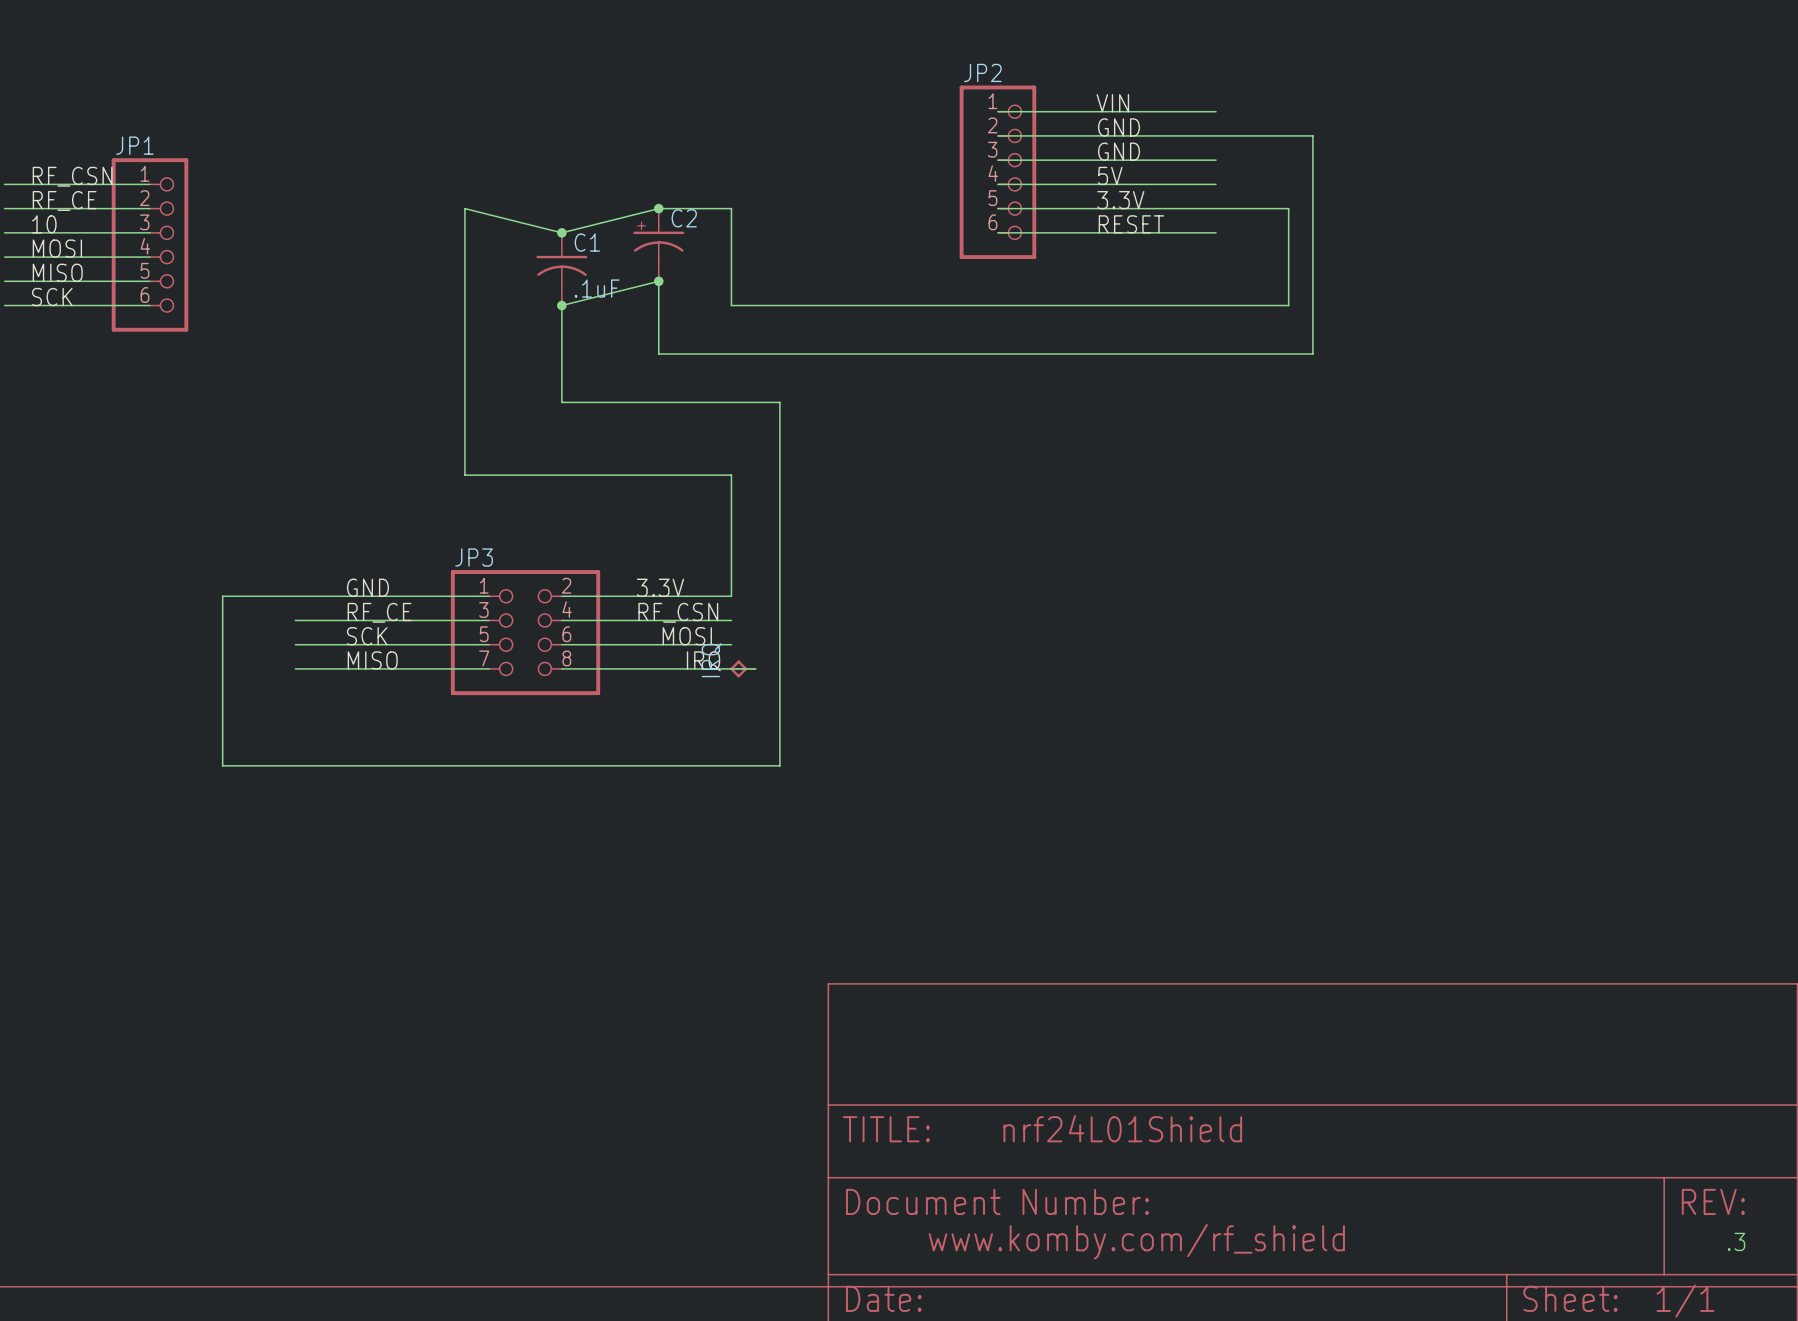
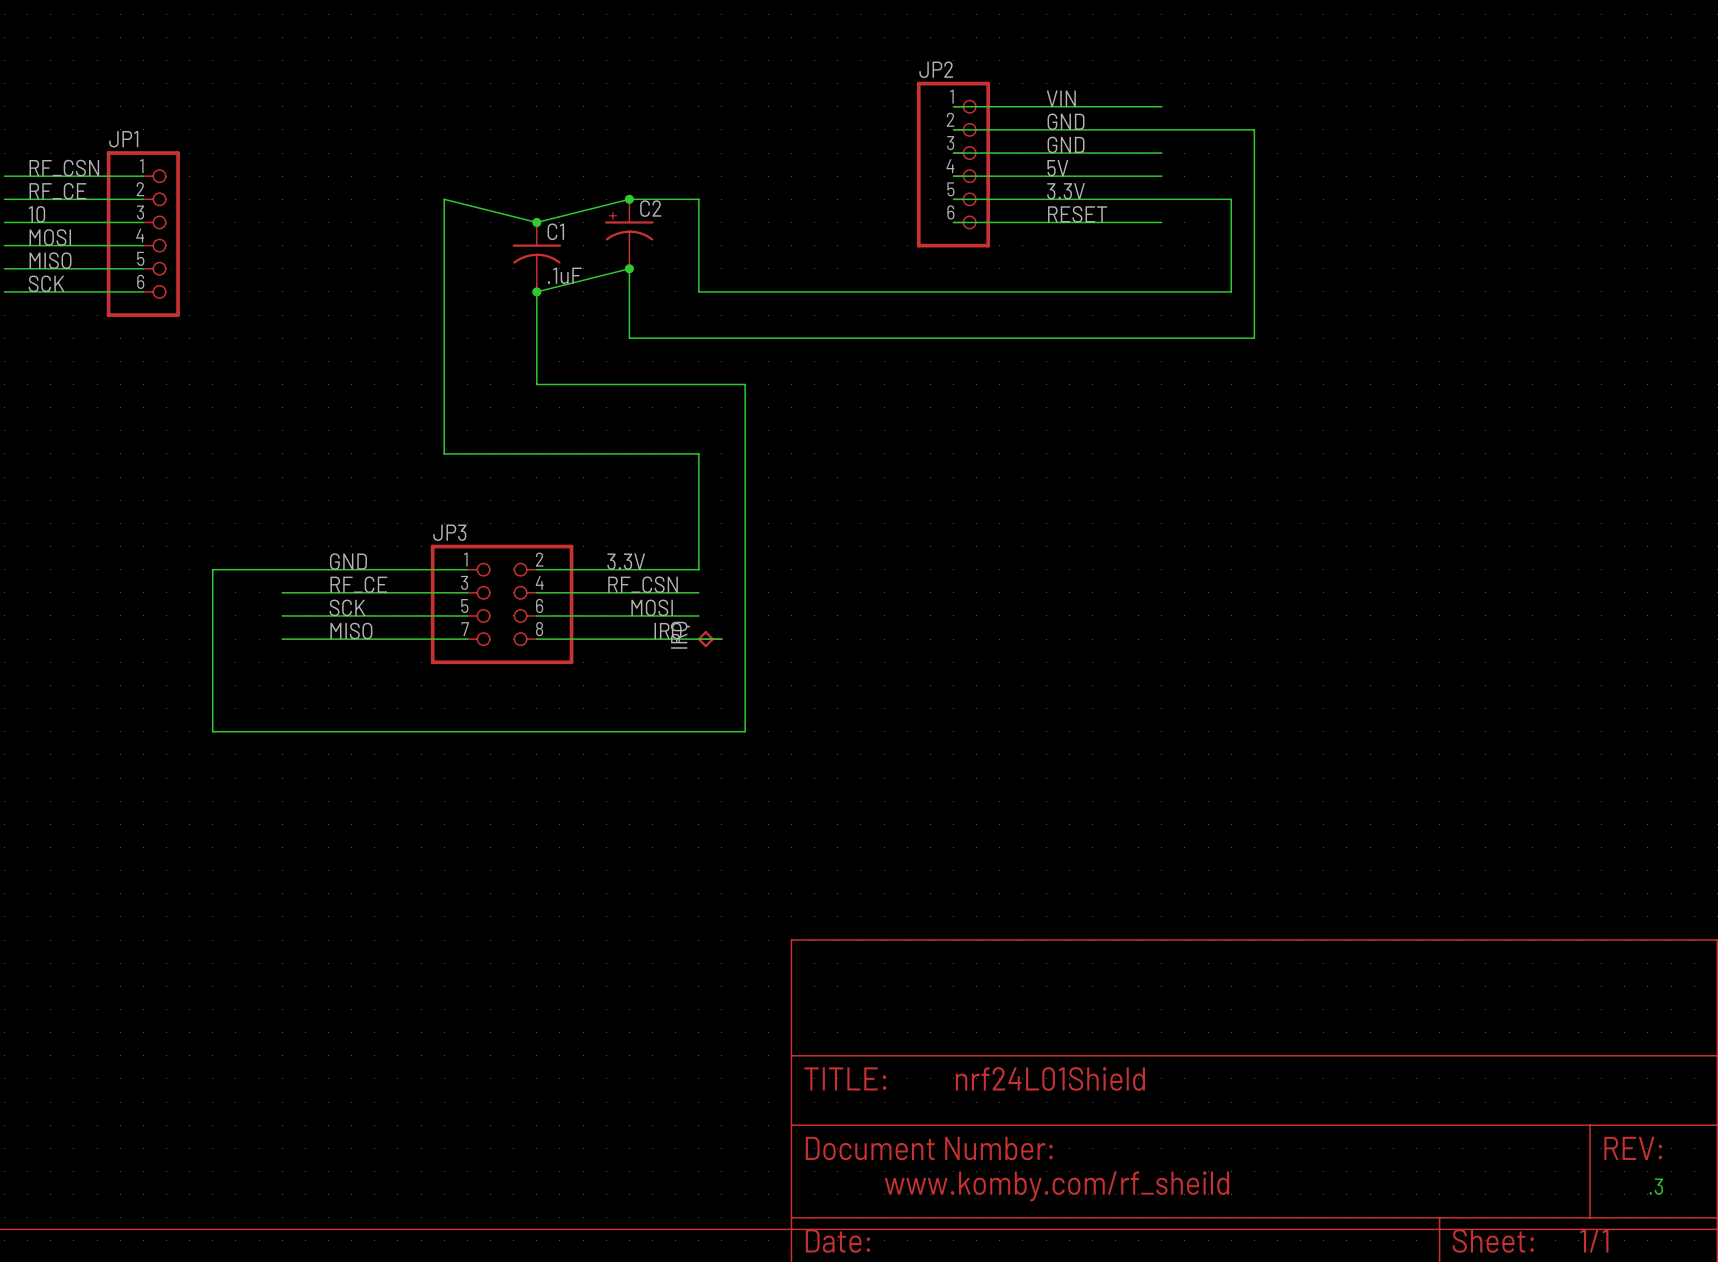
text: www.komby.com/rf_shield (1136, 1241) -> www.komby.com/rf_sheild (1057, 1186)

